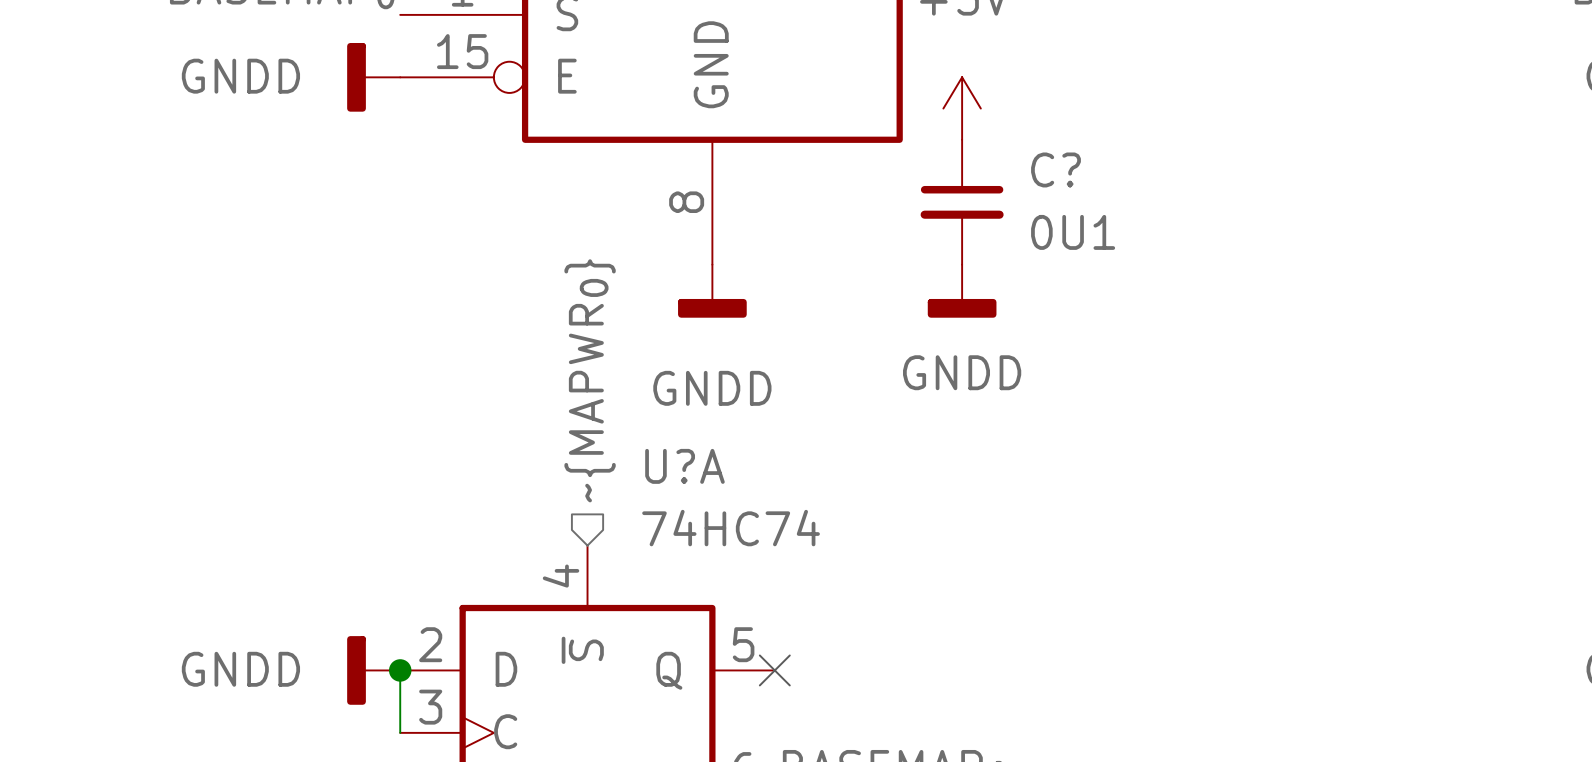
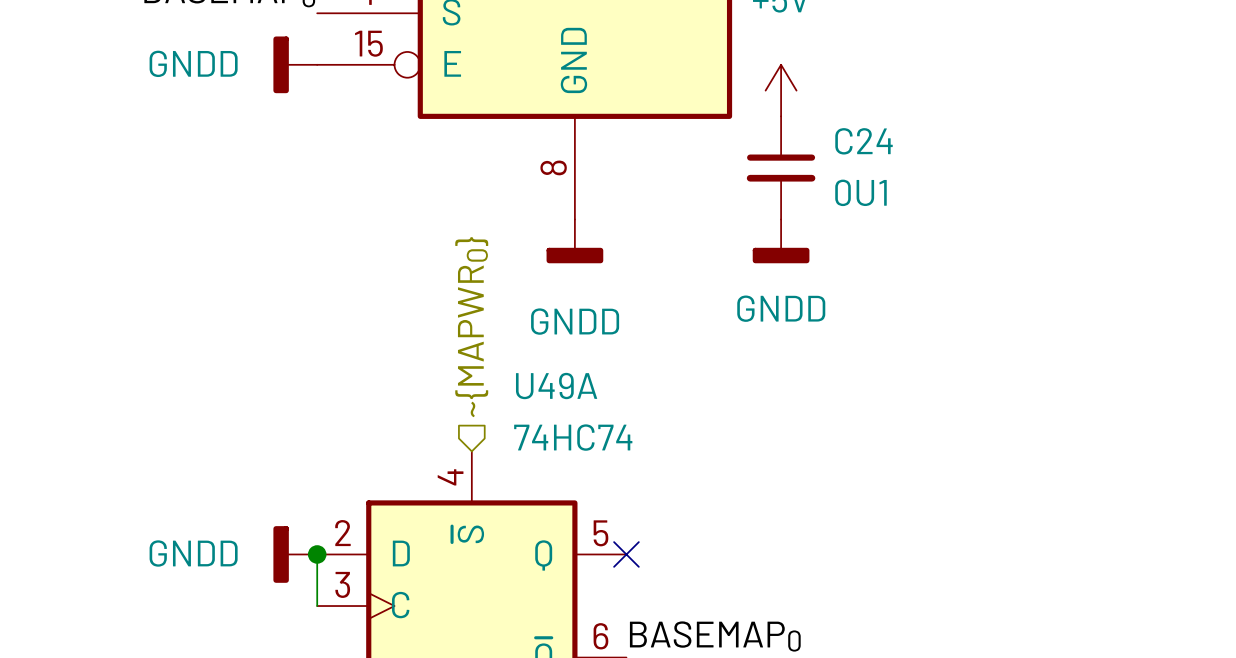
C? name: C? (1056, 169) -> C24 (864, 141)
U?A name: U?A (684, 466) -> U49A (556, 386)

